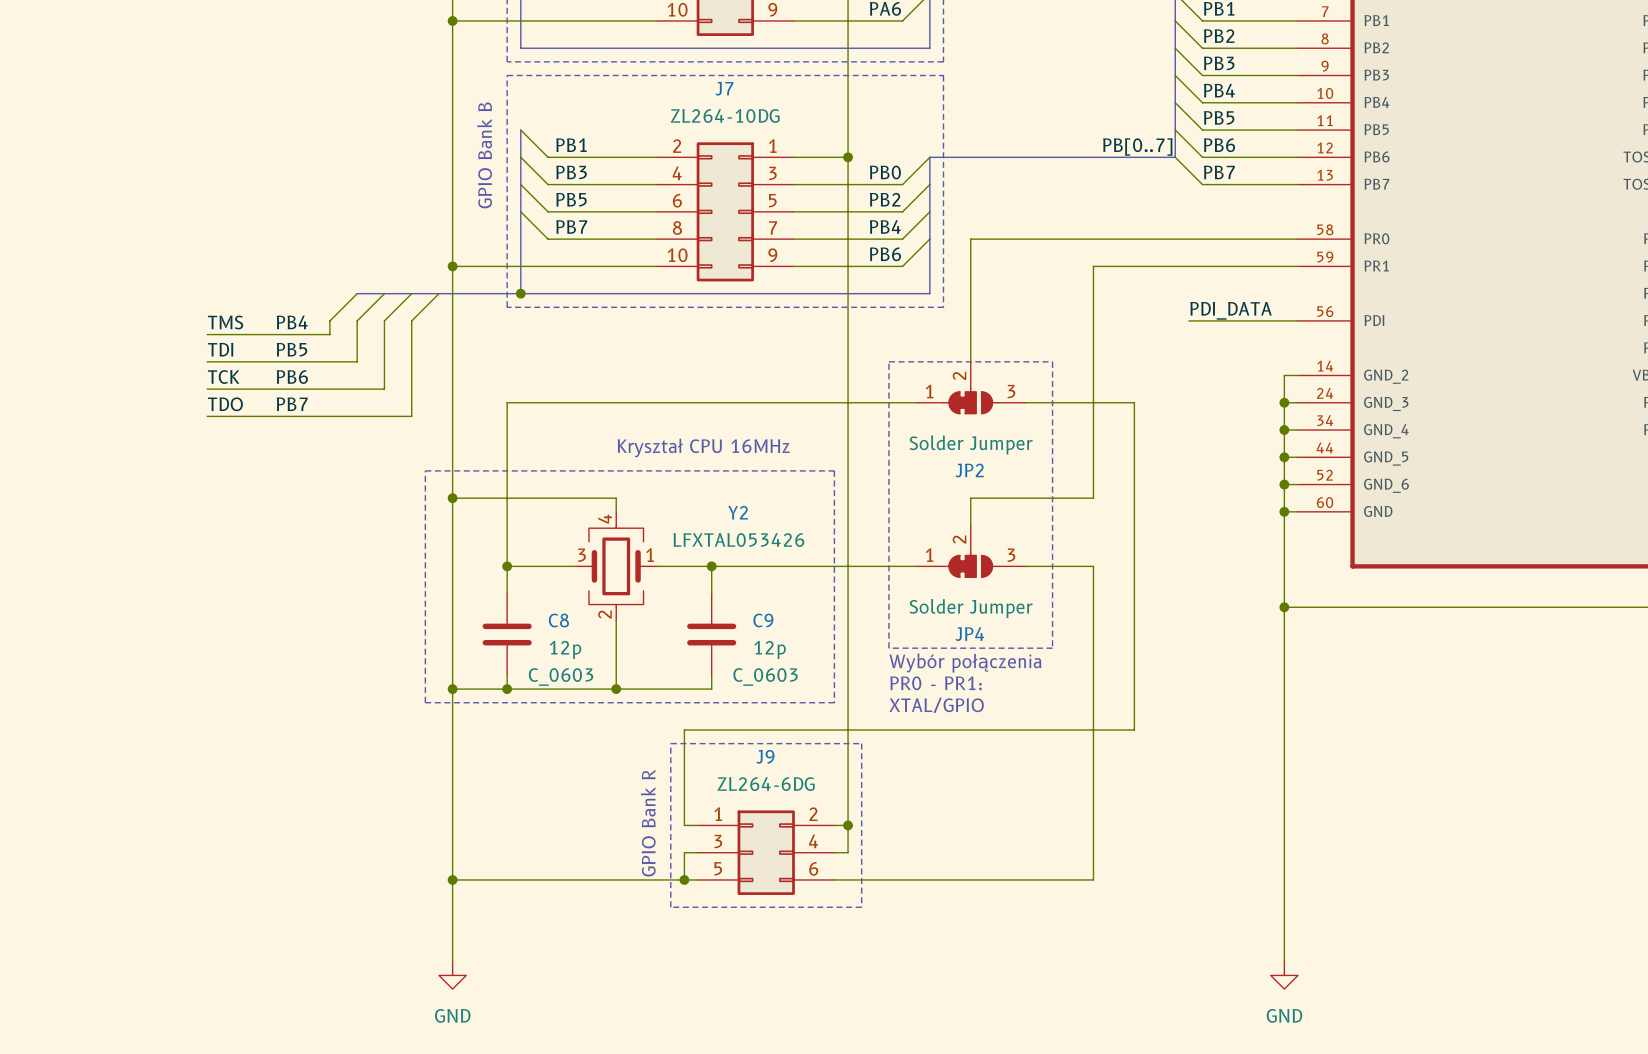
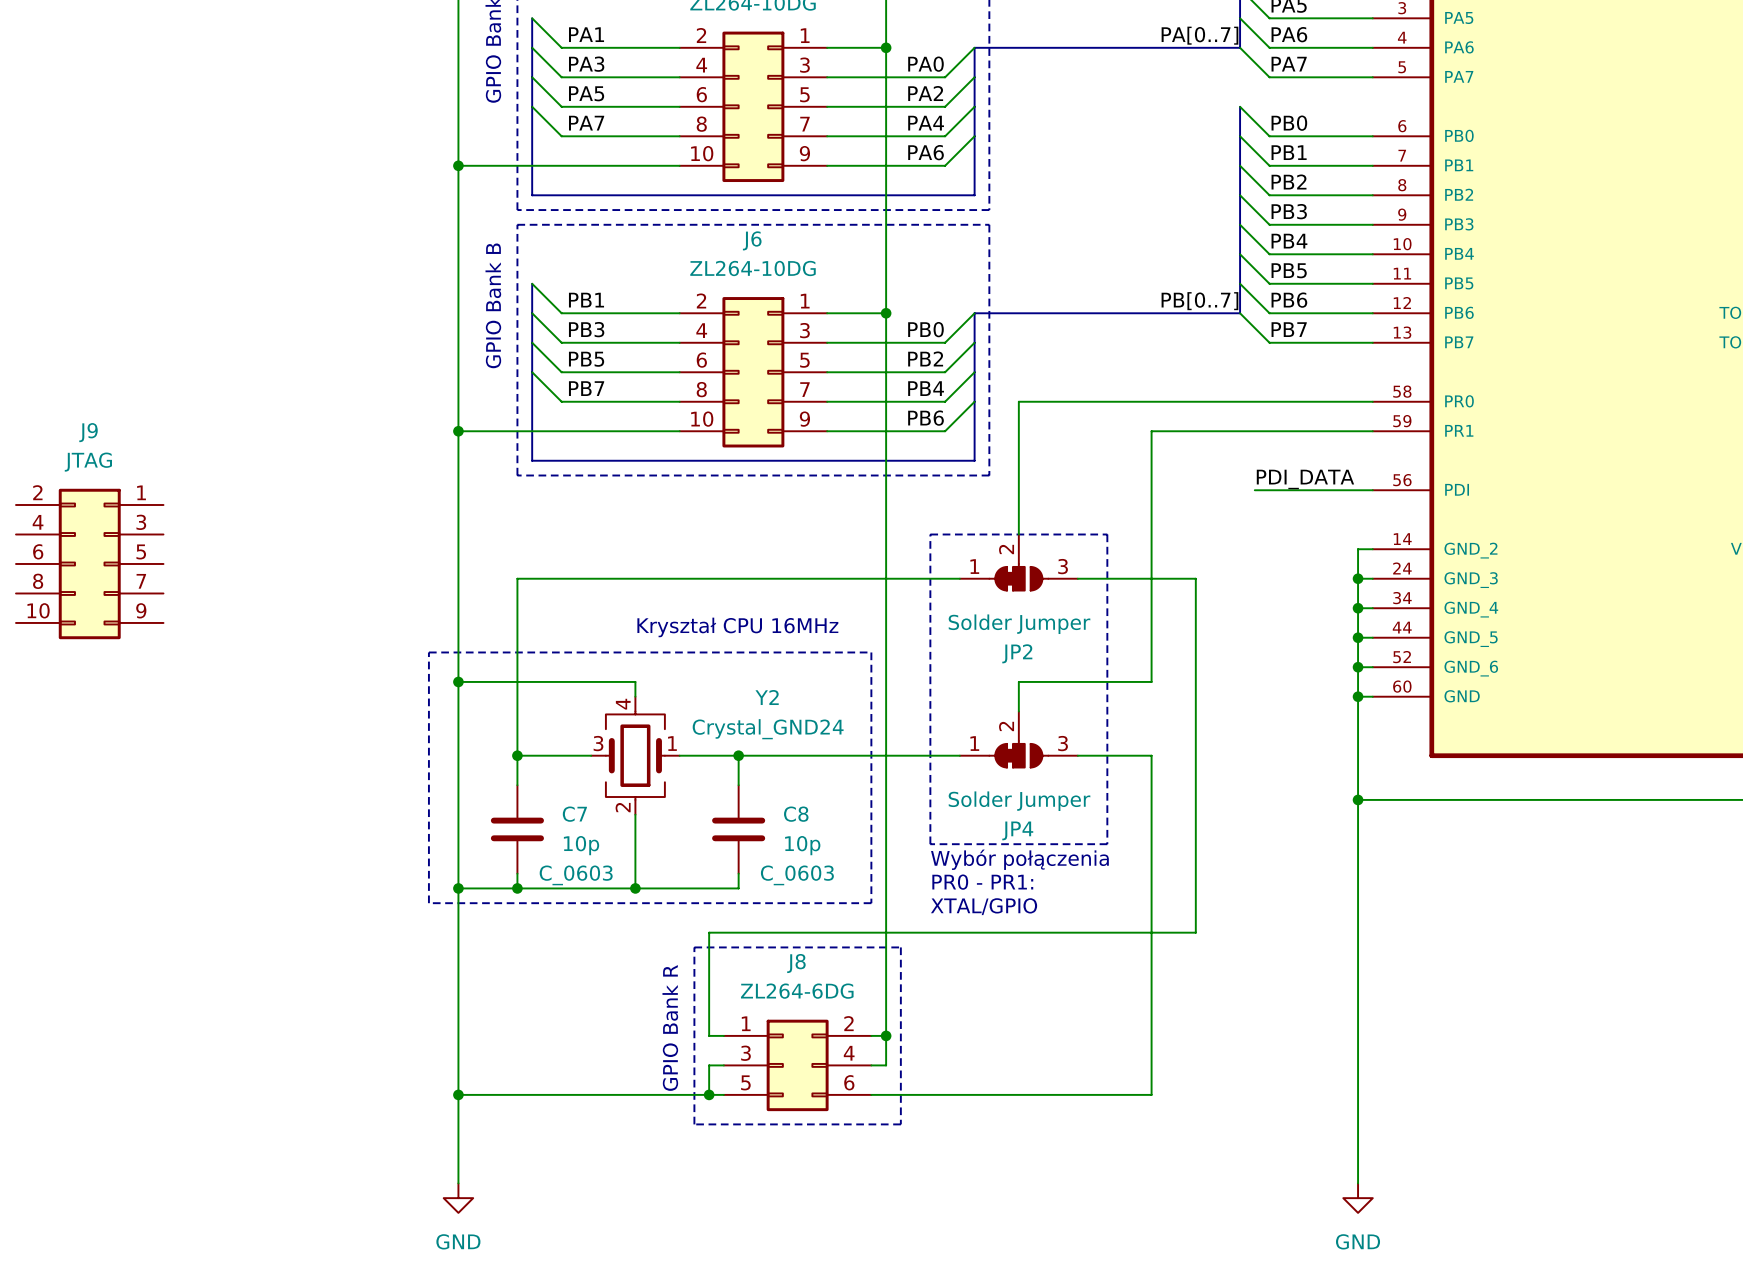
J7 name: J7 (724, 88) -> J6 (752, 240)
wire: (357, 293) (329, 320) (329, 334) (207, 334) -> none
bus: (357, 293) (520, 293) -> none
wire: (384, 293) (357, 320) (357, 361) (207, 361) -> none
wire: (411, 293) (384, 320) (384, 389) (207, 389) -> none
wire: (438, 293) (411, 320) (411, 416) (207, 416) -> none
junction: (520, 293) -> none
label: TMS (225, 322) -> none
label: PB4 (292, 322) -> none
label: TDI (220, 349) -> none
label: PB5 (291, 349) -> none
label: TCK (223, 377) -> none
label: PB6 (292, 377) -> none
J9: none -> JTAG (89, 563)
label: TDO (225, 404) -> none
label: PB7 (292, 404) -> none
Y2 value: LFXTAL053426 (738, 540) -> Crystal_GND24 (768, 729)
C8 name: C8 (558, 620) -> C7 (574, 814)
C9 name: C9 (763, 620) -> C8 (796, 814)
C8 value: 12p (565, 649) -> 10p (581, 845)
C9 value: 12p (770, 649) -> 10p (802, 845)
J9 name: J9 (765, 756) -> J8 (796, 963)

